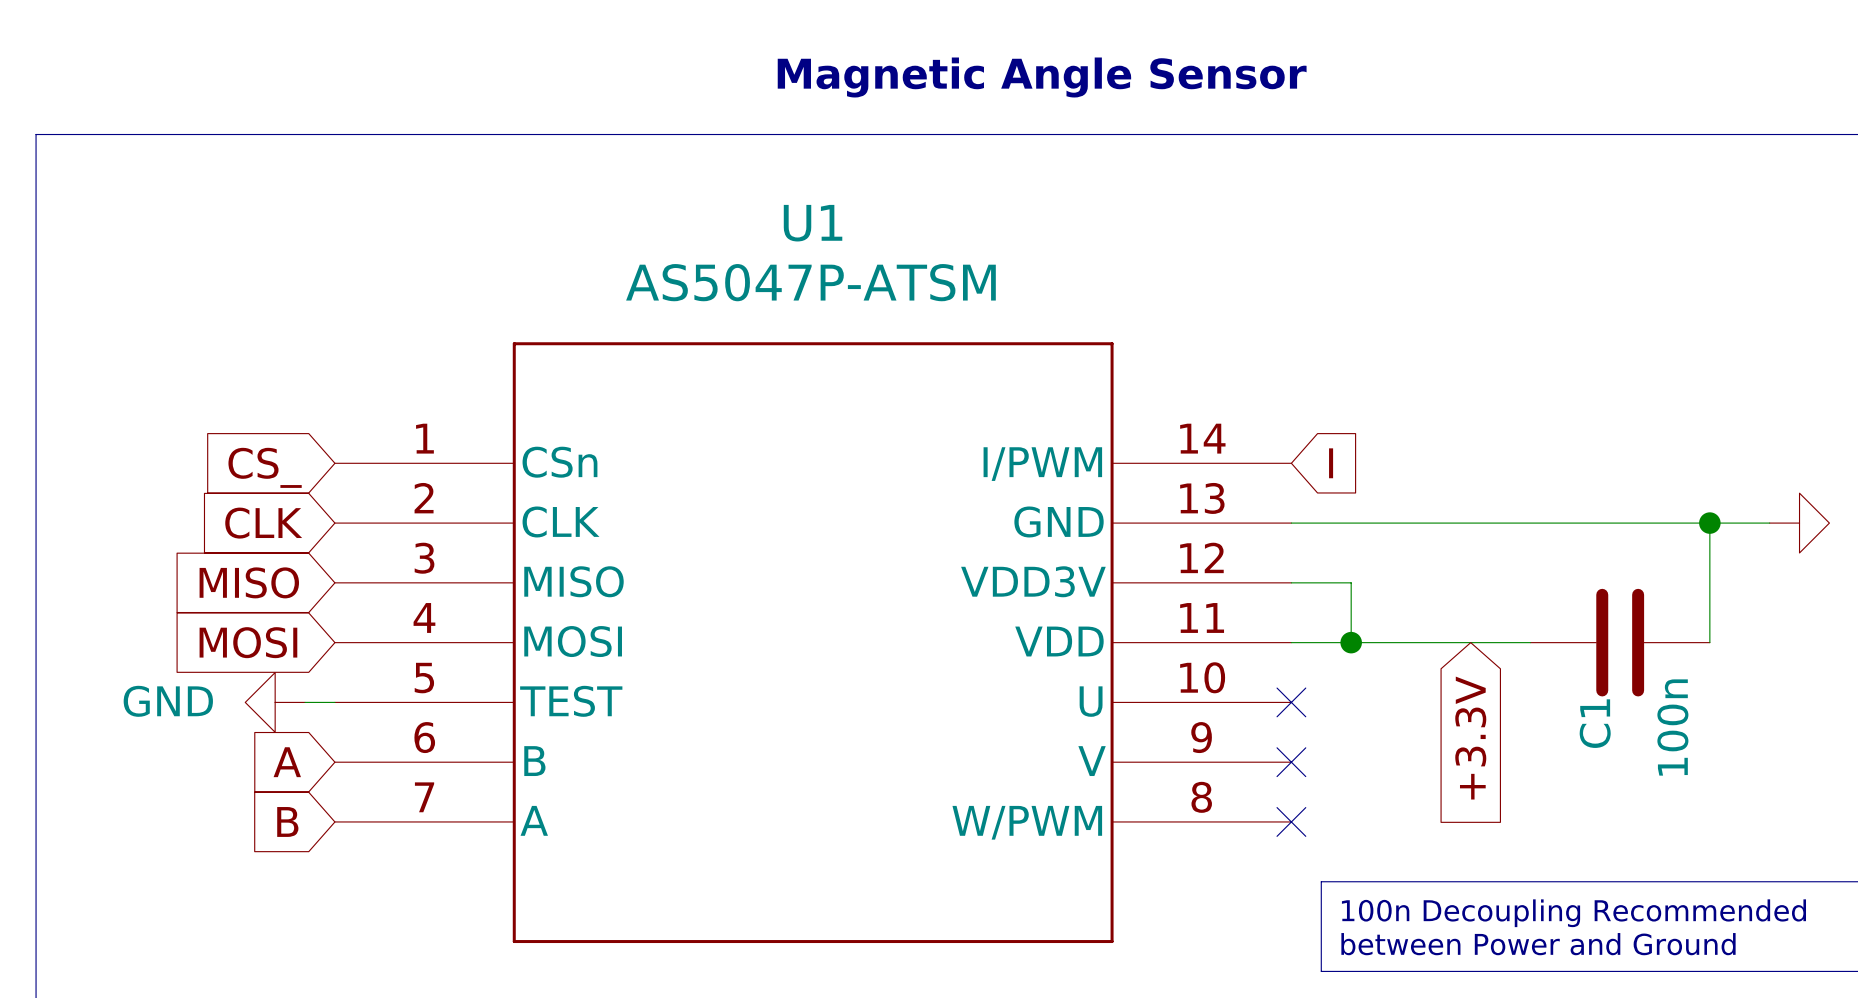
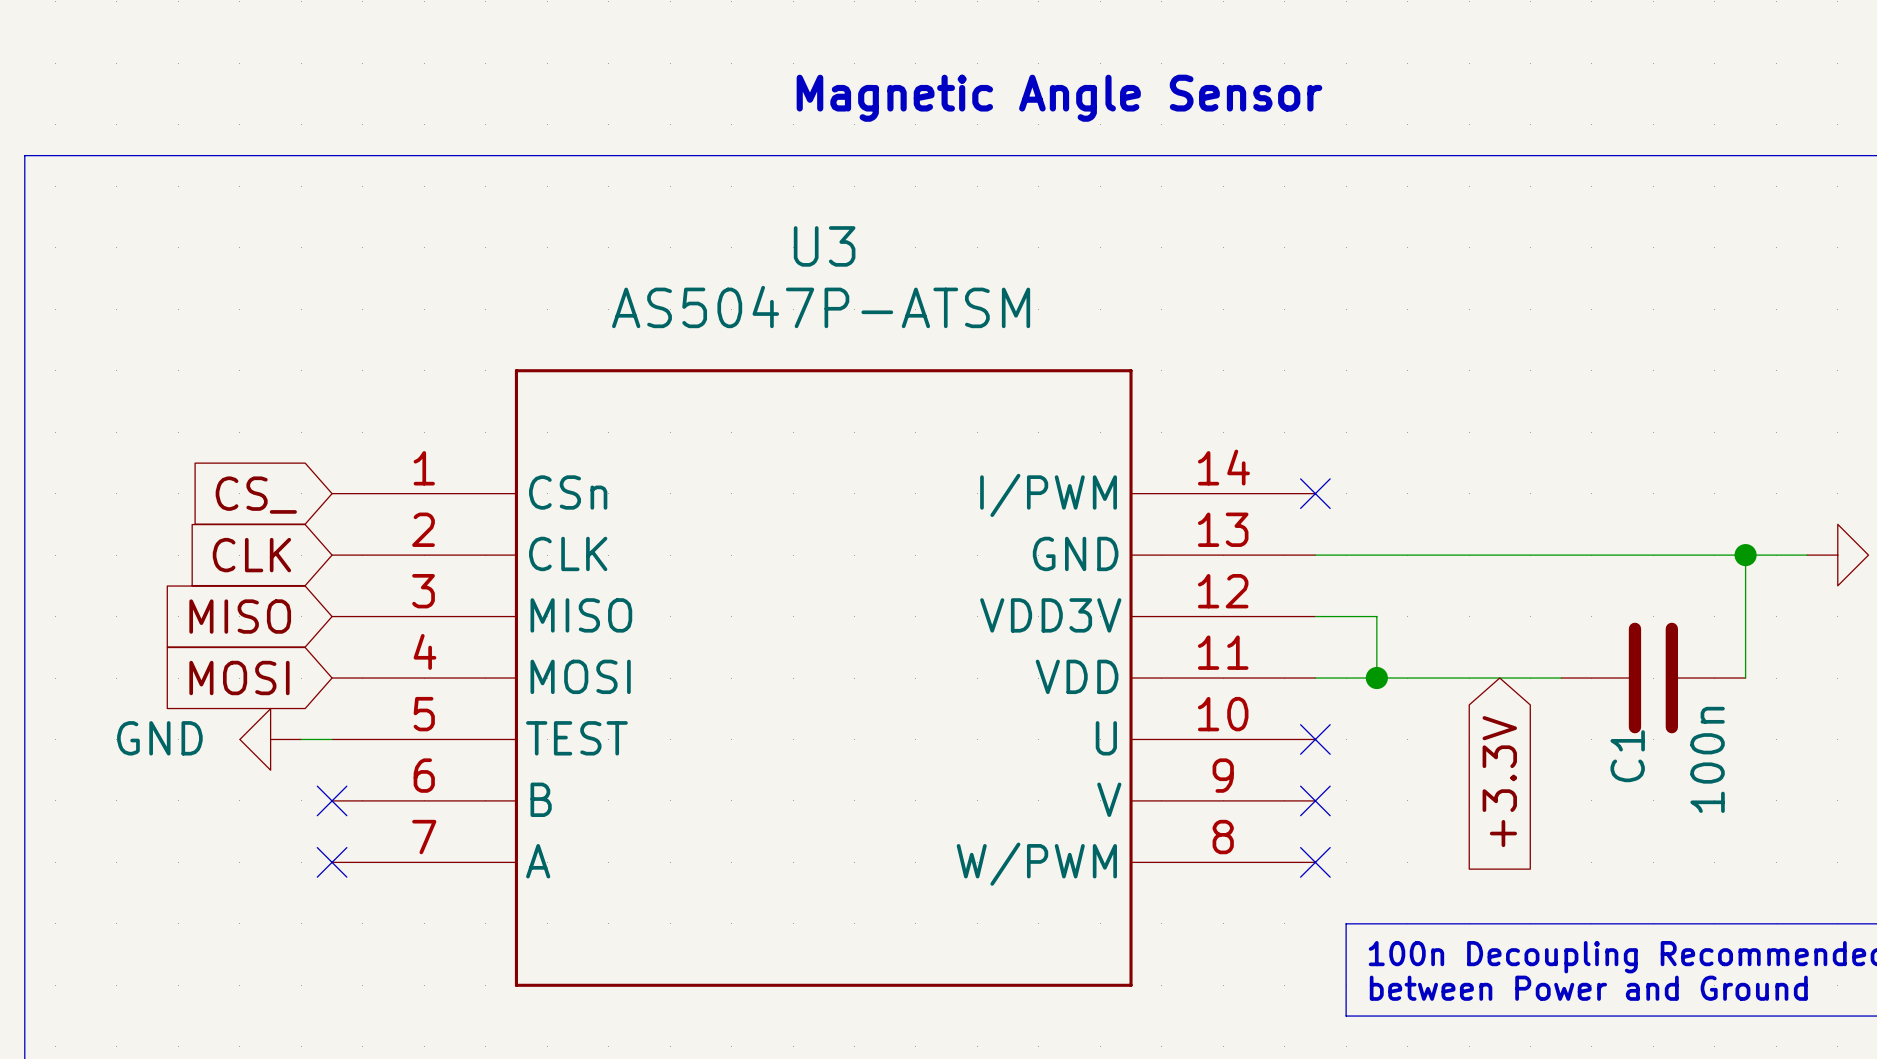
U1 name: U1 (813, 223) -> U3 (824, 246)
no-connect mark: none -> (1315, 493)
global label: I (1331, 463) -> none
global label: A (287, 762) -> none
no-connect mark: none -> (332, 800)
global label: B (287, 821) -> none
no-connect mark: none -> (332, 862)

